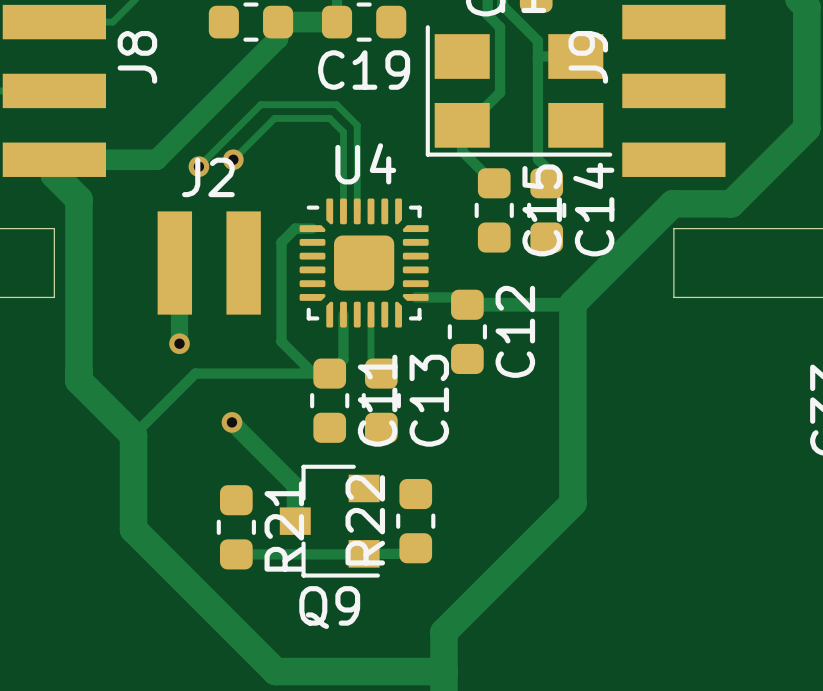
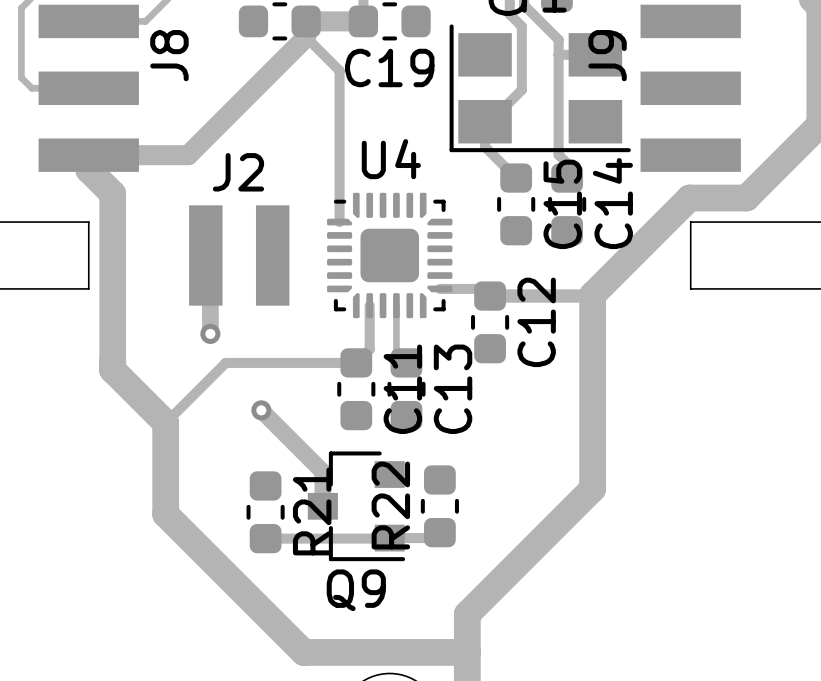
track: (233, 159) (274, 118) (329, 118) (343, 132) (343, 211) -> none
via: (233, 159) -> none
track: (198, 166) (260, 104) (336, 104) (357, 125) (357, 211) -> none
via: (198, 166) -> none
track: (312, 228) (295, 228) (281, 242) (281, 341) (313, 373) -> (339, 222) (339, 70) (306, 37)

